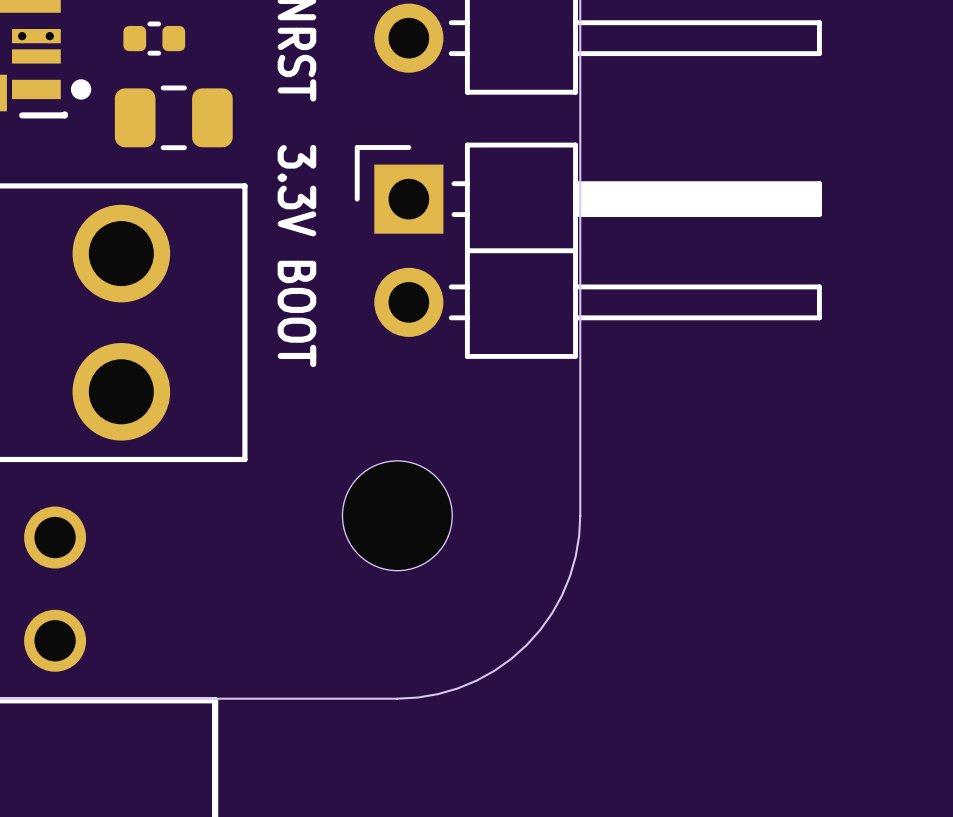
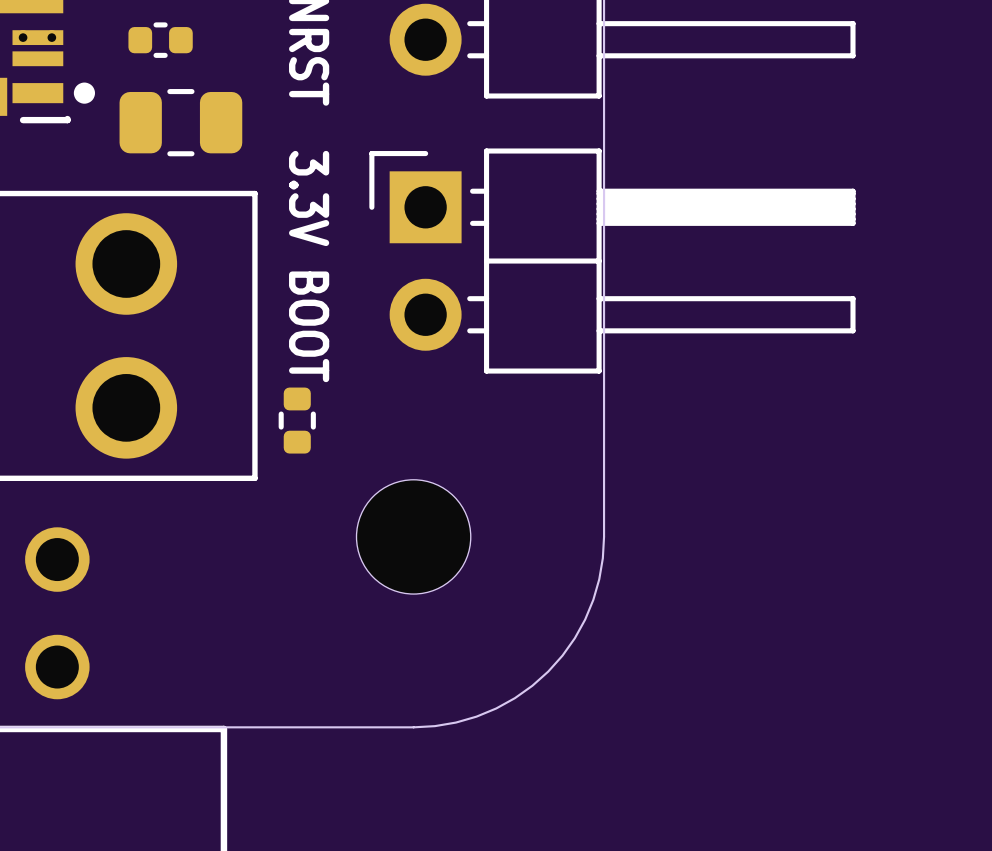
part: none -> (297, 420)

